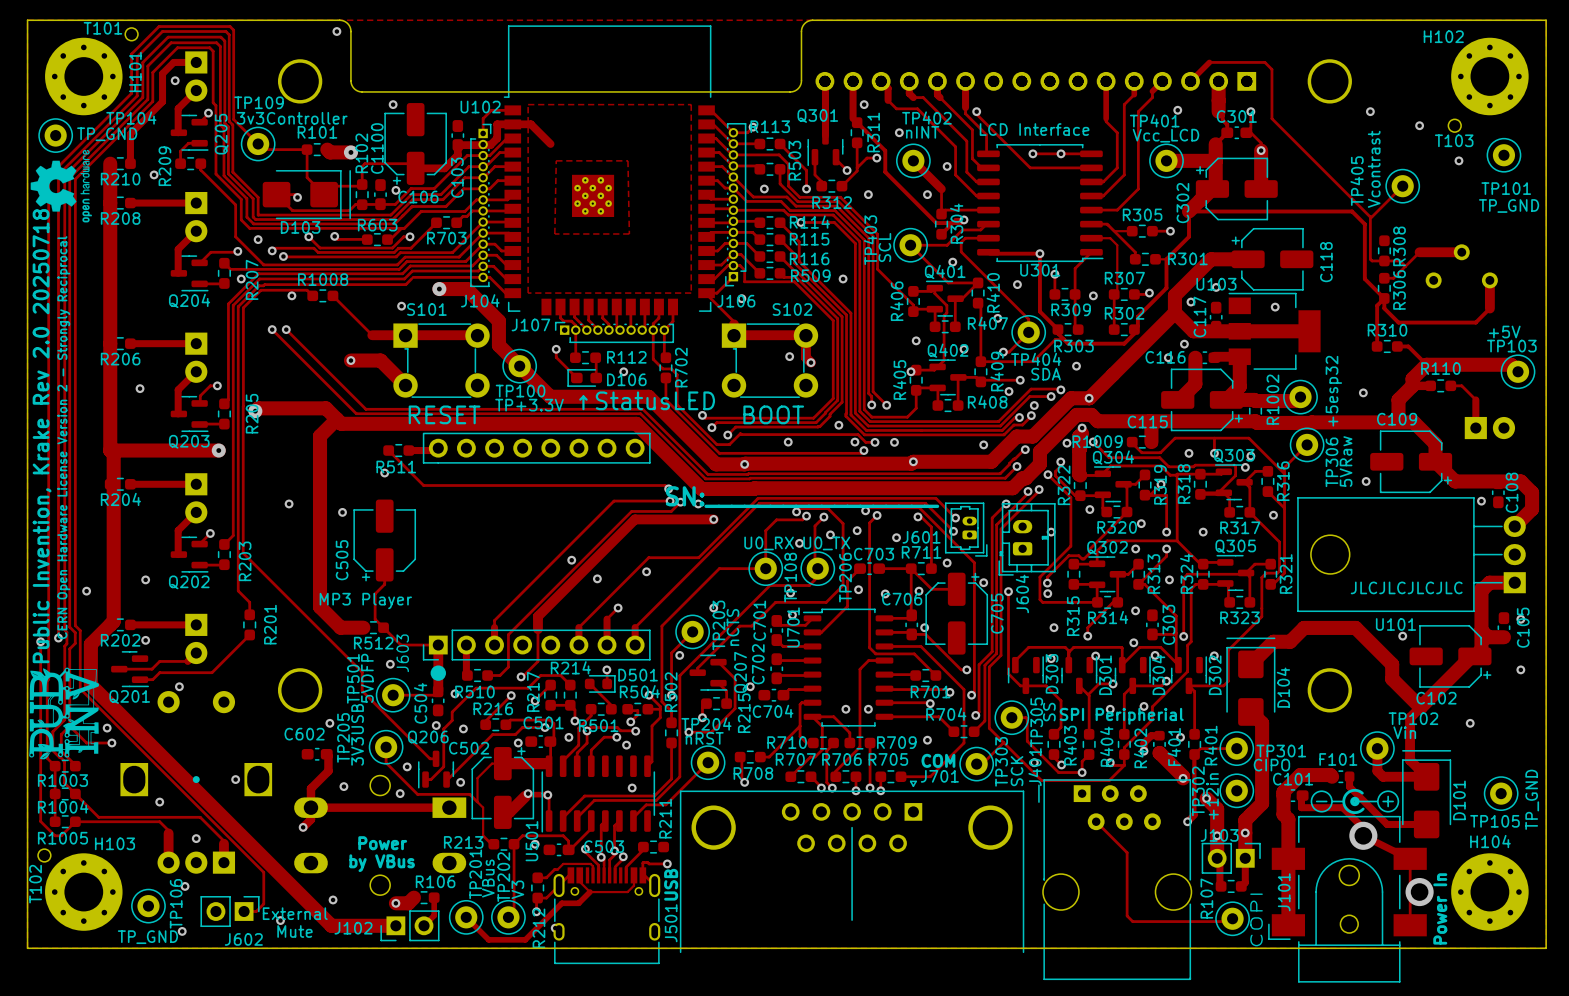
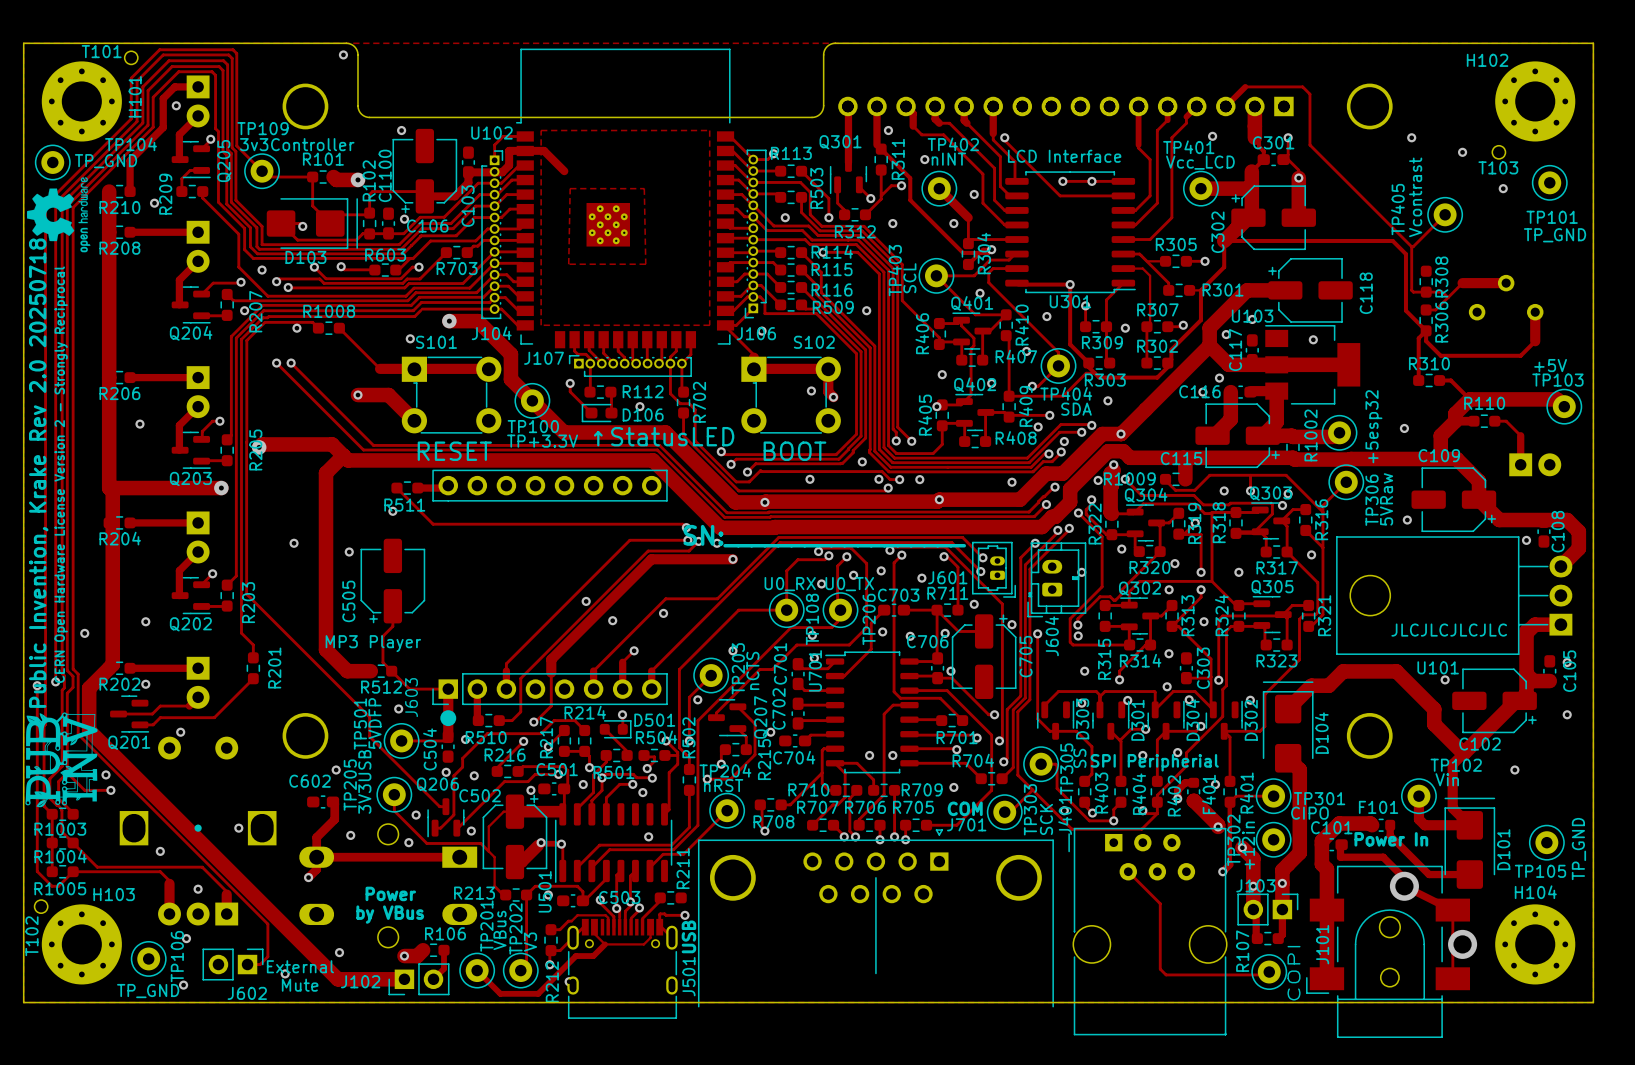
drawing: [1310, 788, 1400, 815] -> none
text rotation: 0° (1440, 908) -> 90° clockwise (1391, 839)
text position: Power In (1440, 908) -> Power In (1391, 839)

